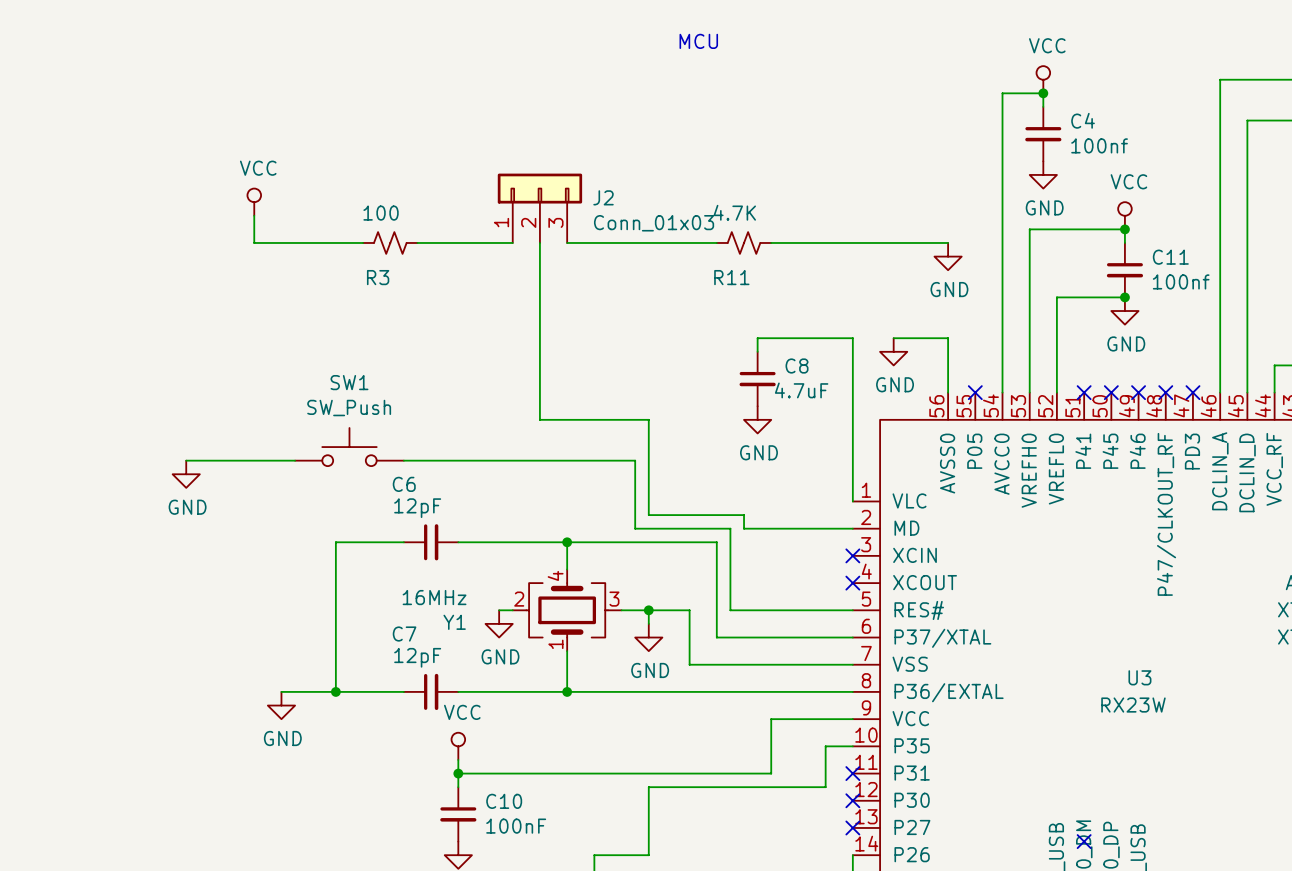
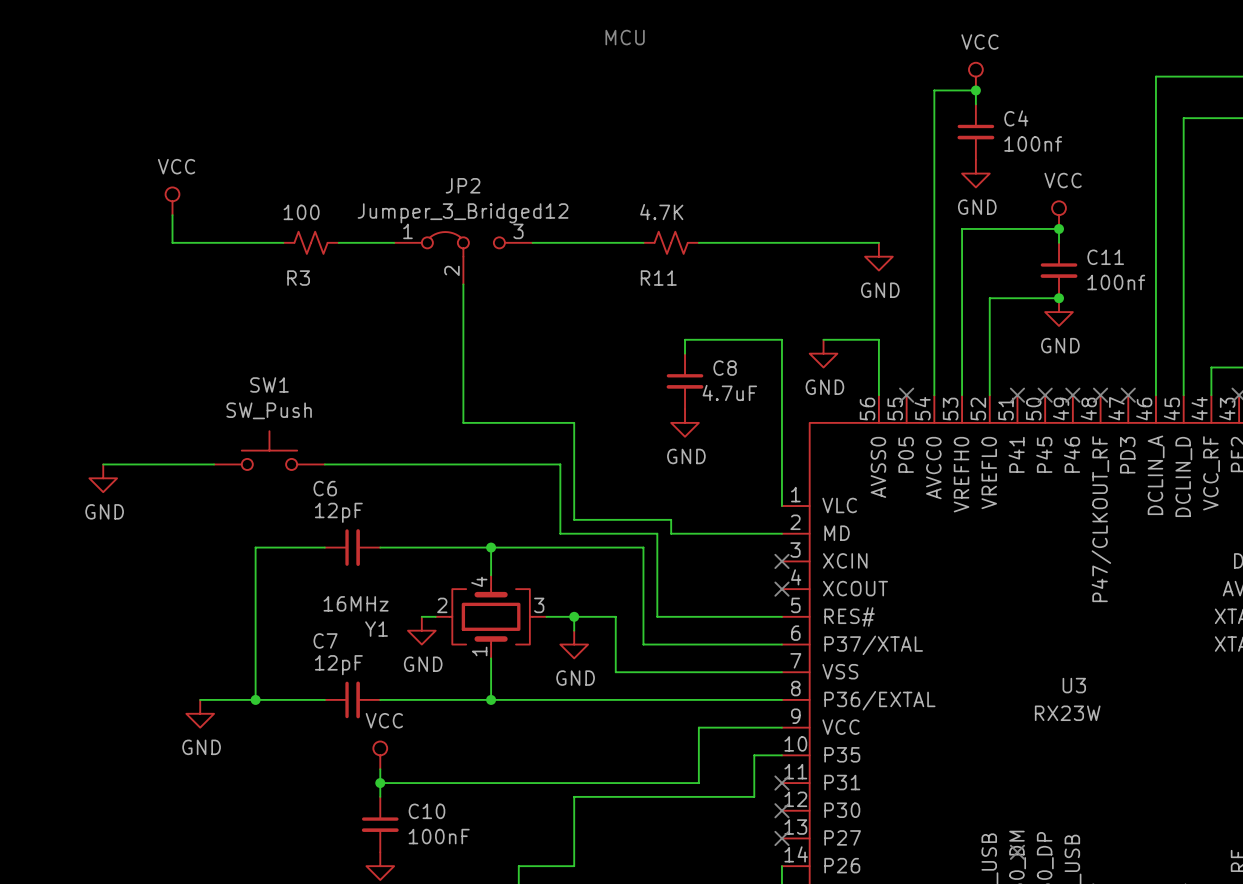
J2: Conn_01x03 (539, 208) -> none
JP2: none -> Jumper_3_Bridged12 (463, 258)

